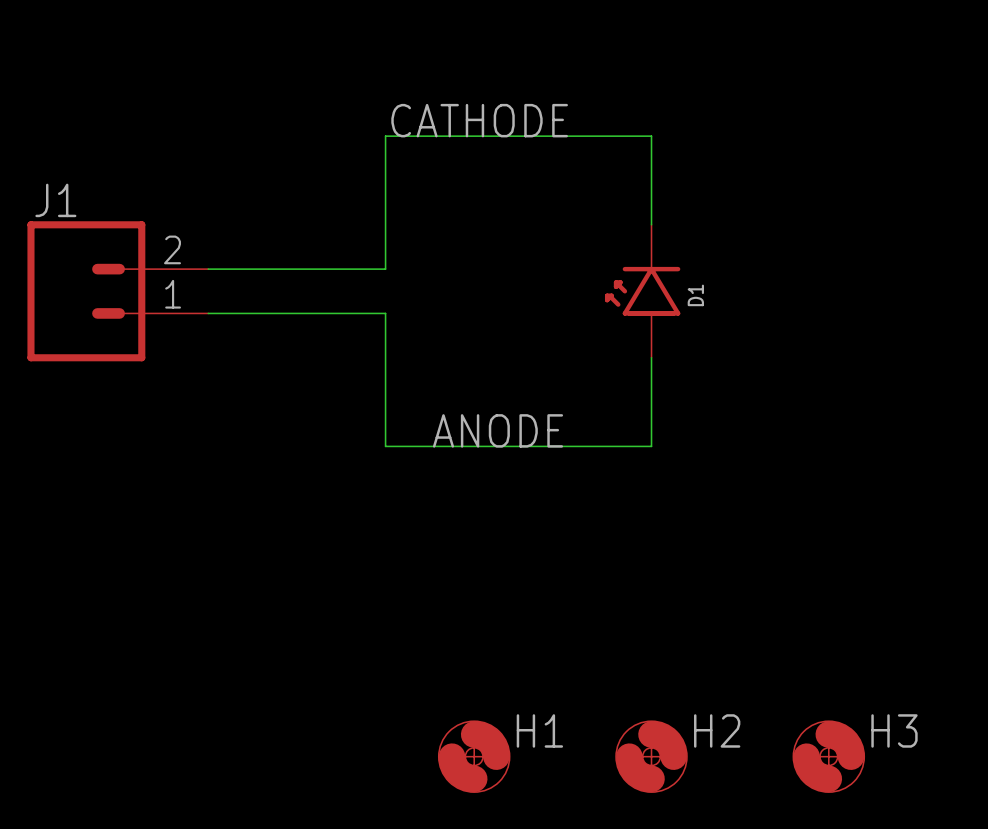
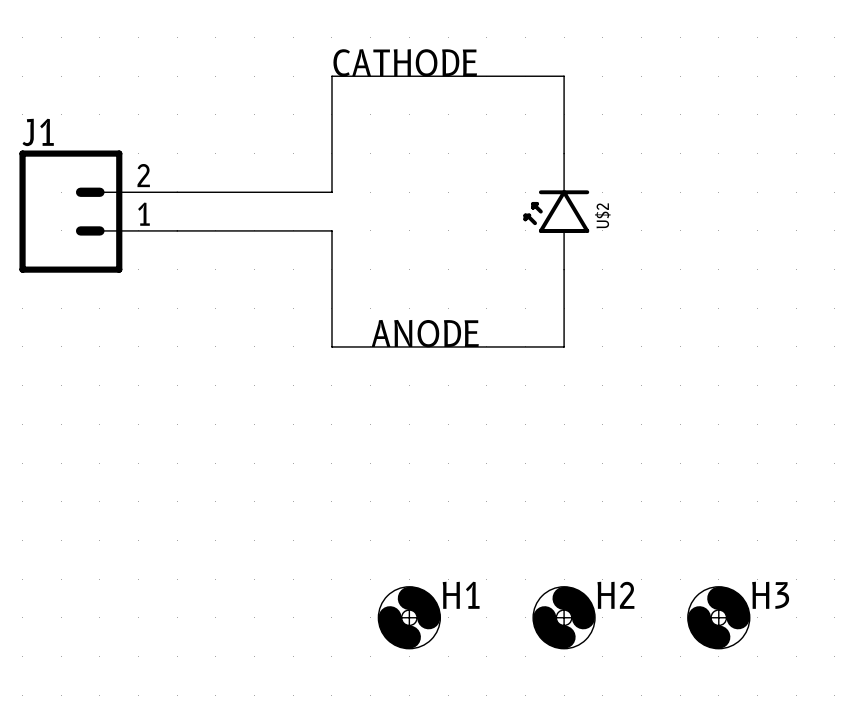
D1 name: D1 (695, 295) -> U$2 (602, 215)

